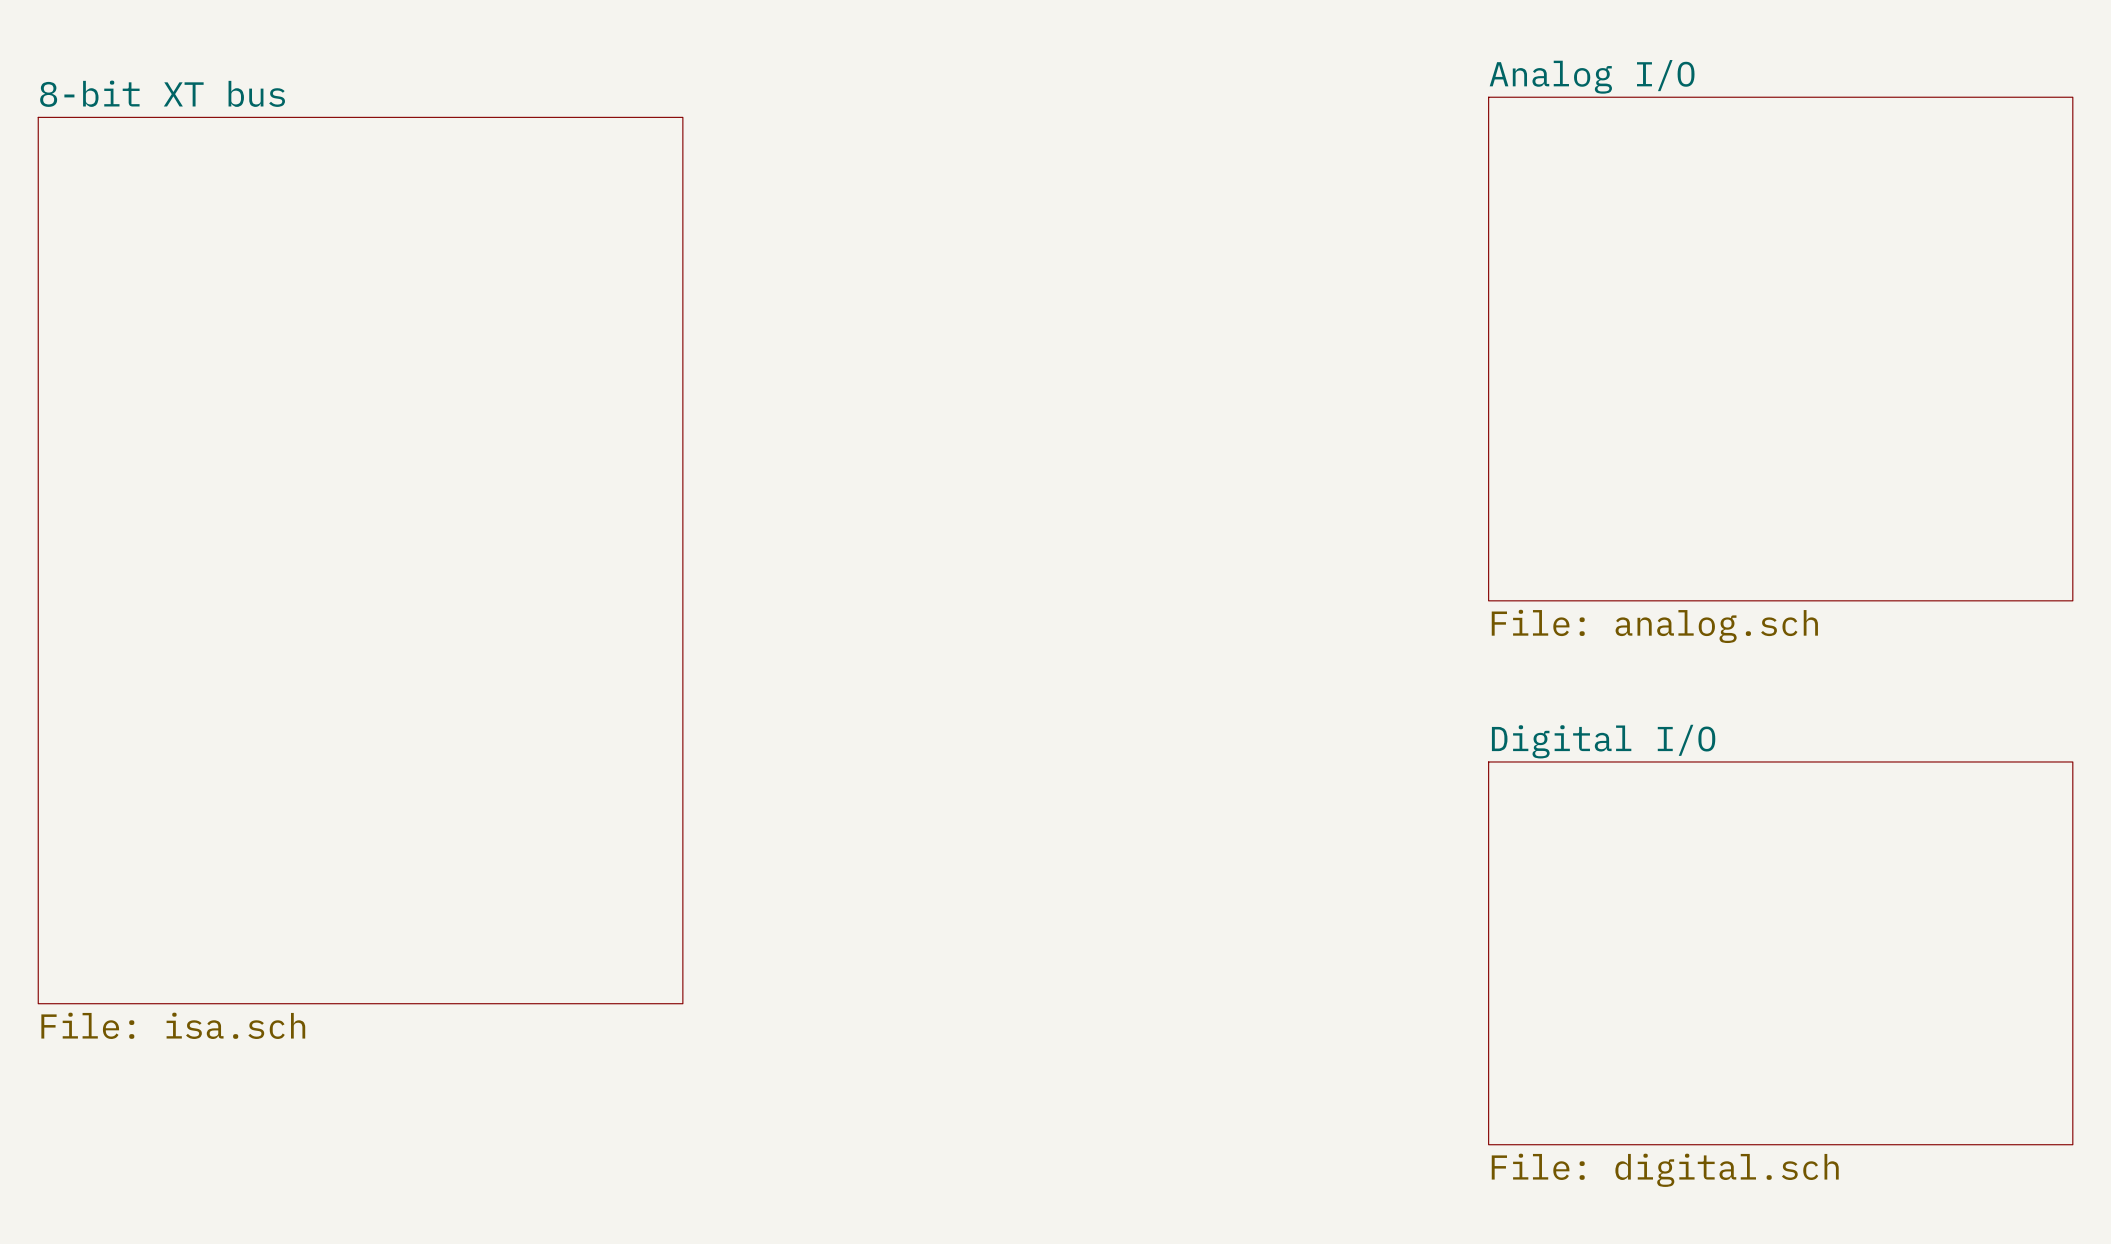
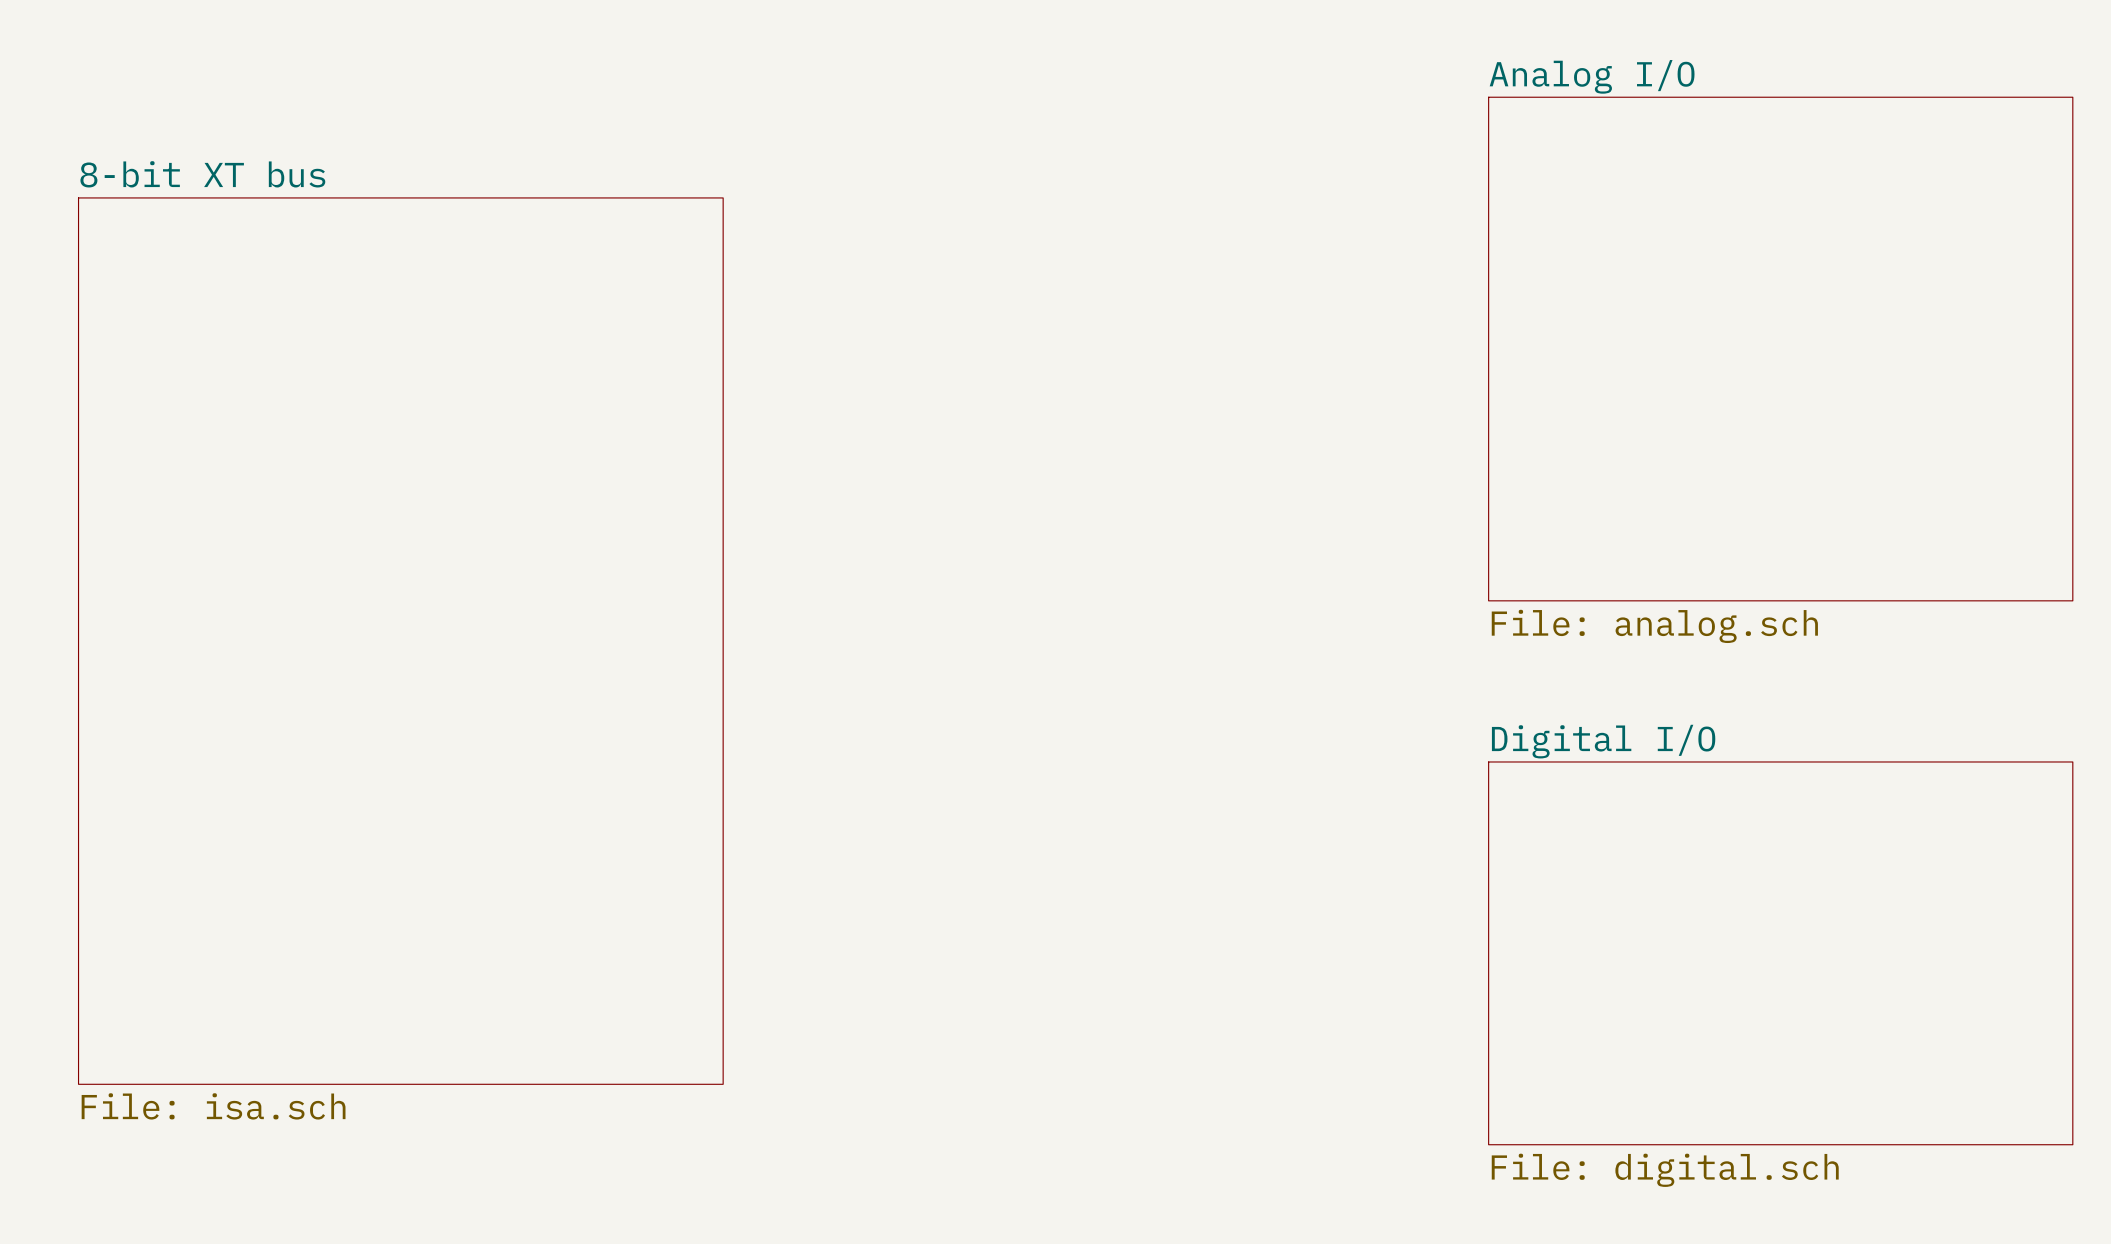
sheet 8-bit XT bus position: (360, 560) -> (400, 641)

